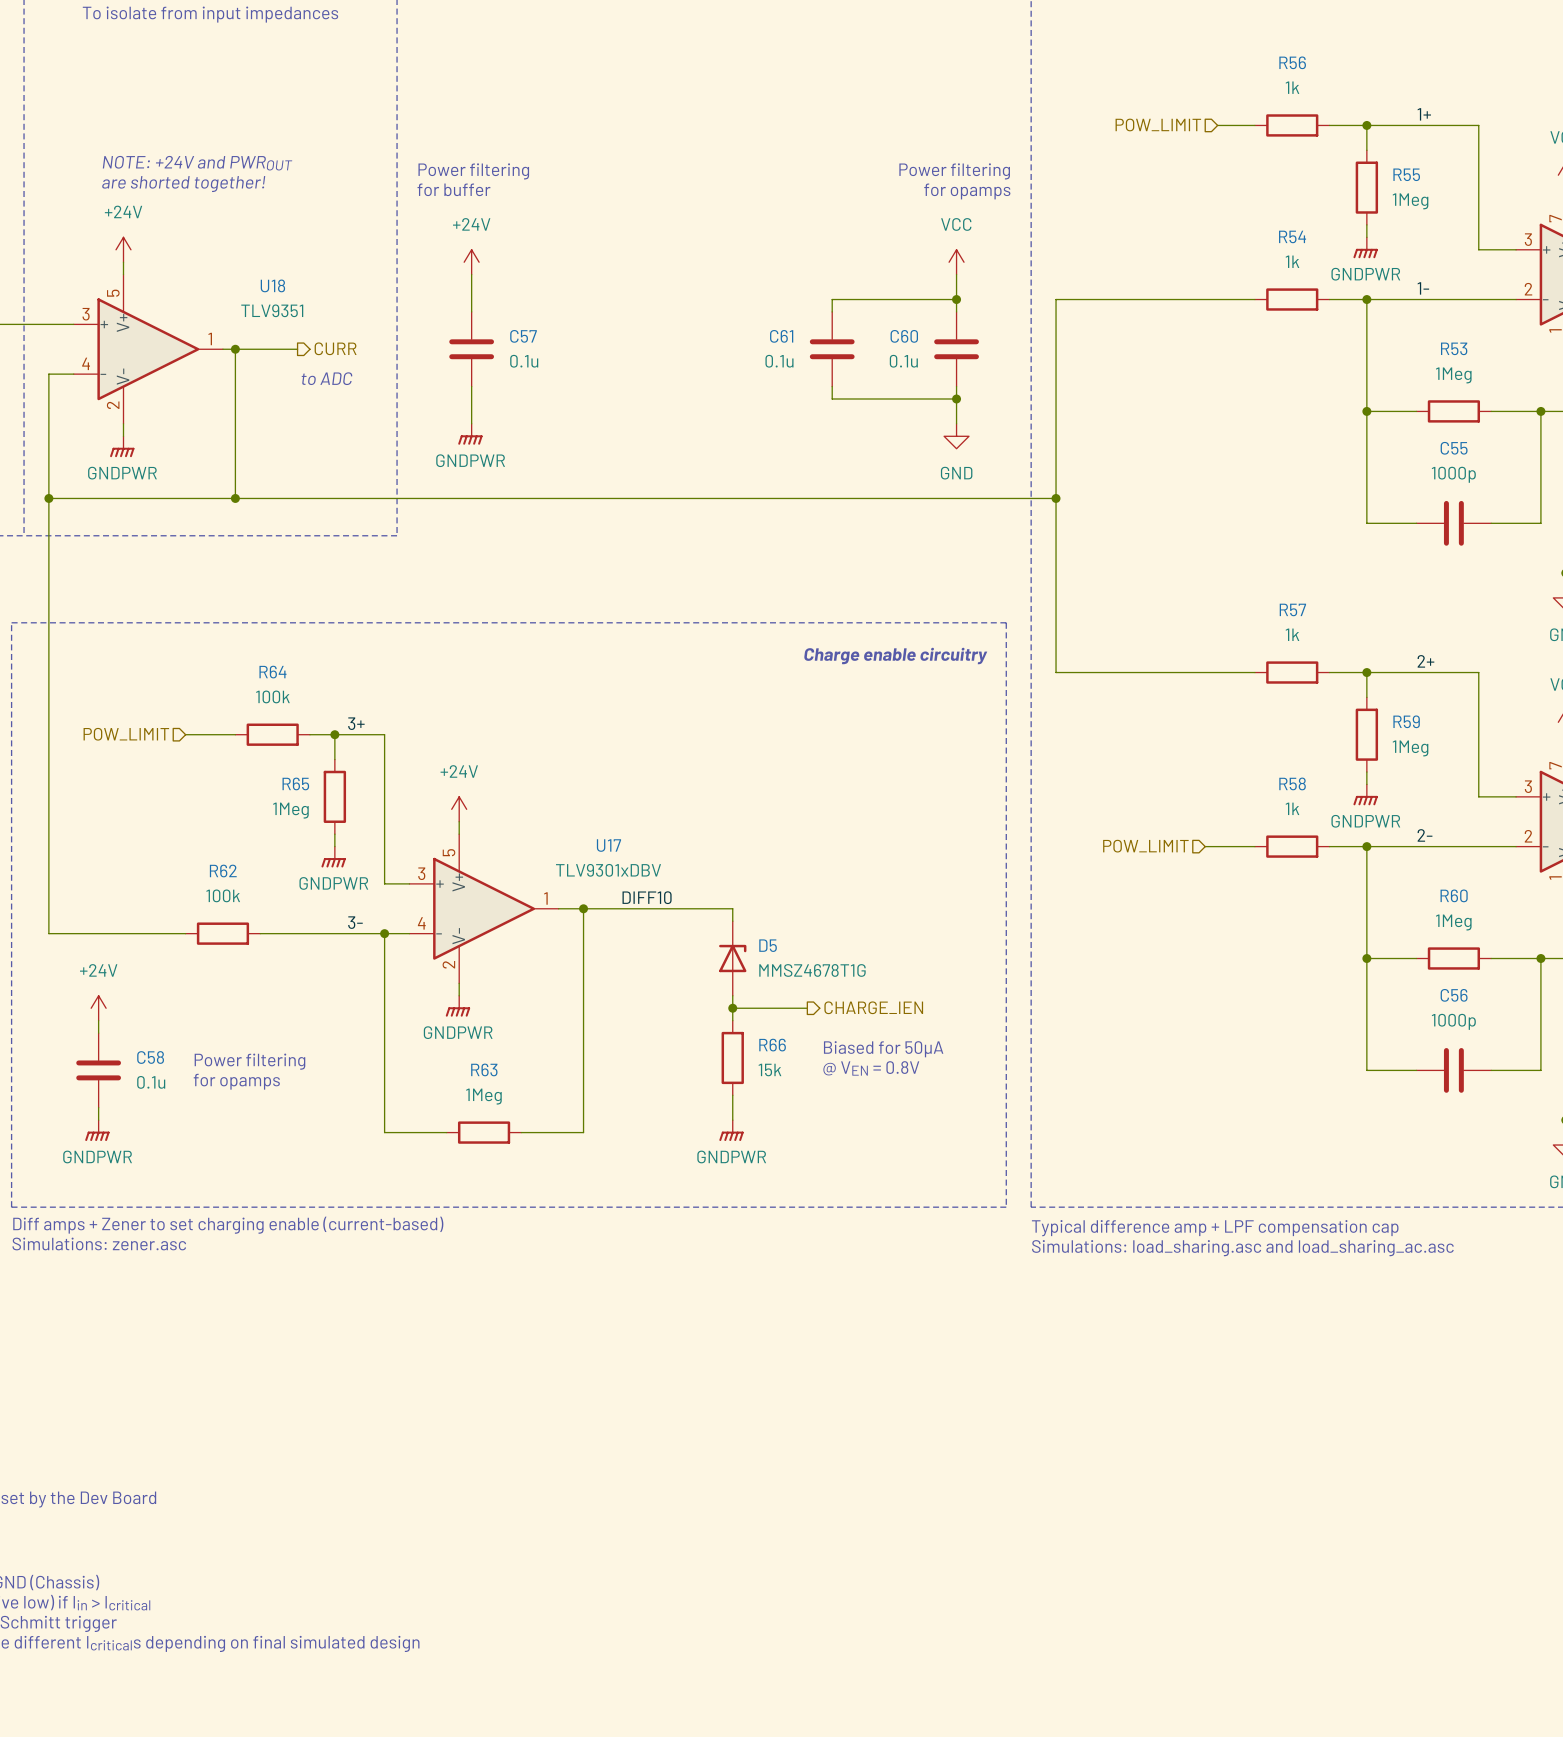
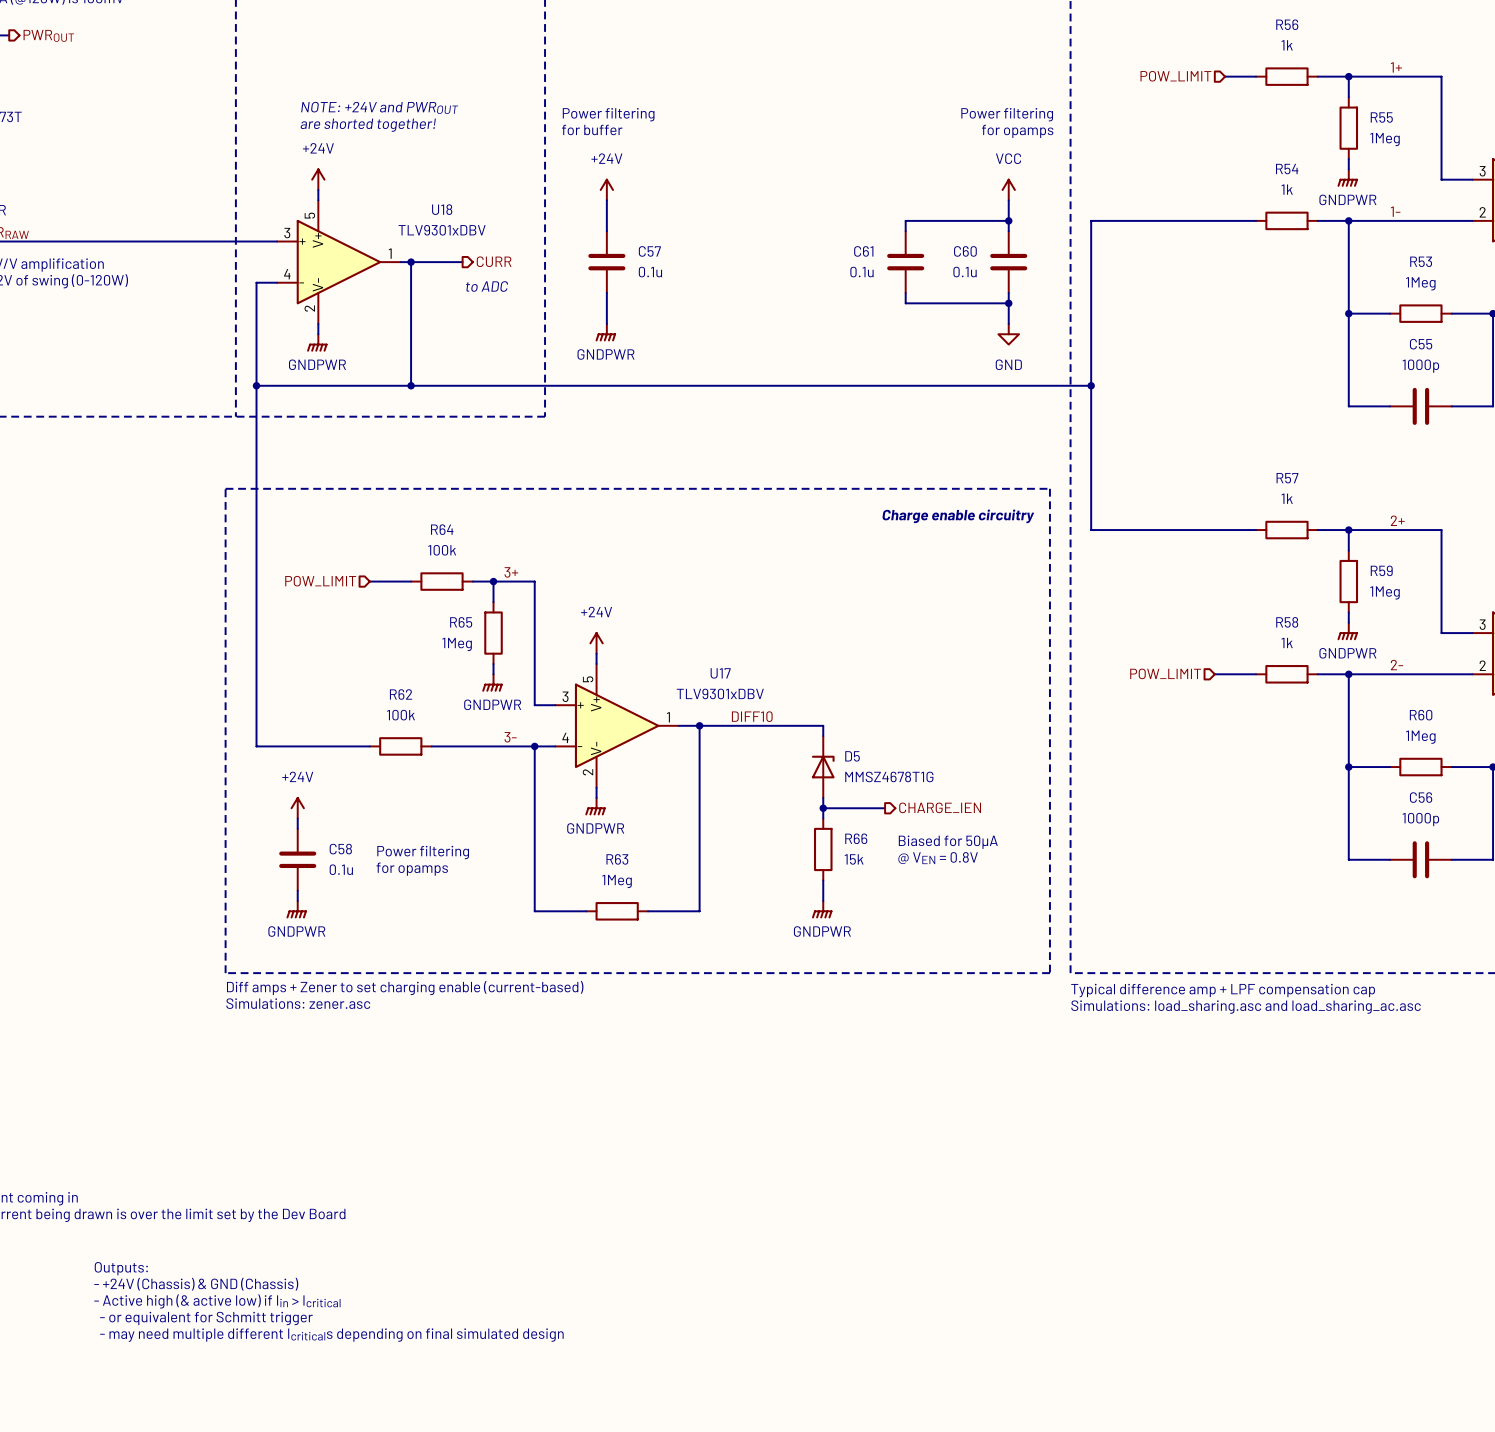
U18 value: TLV9351 (272, 310) -> TLV9301xDBV (442, 230)

